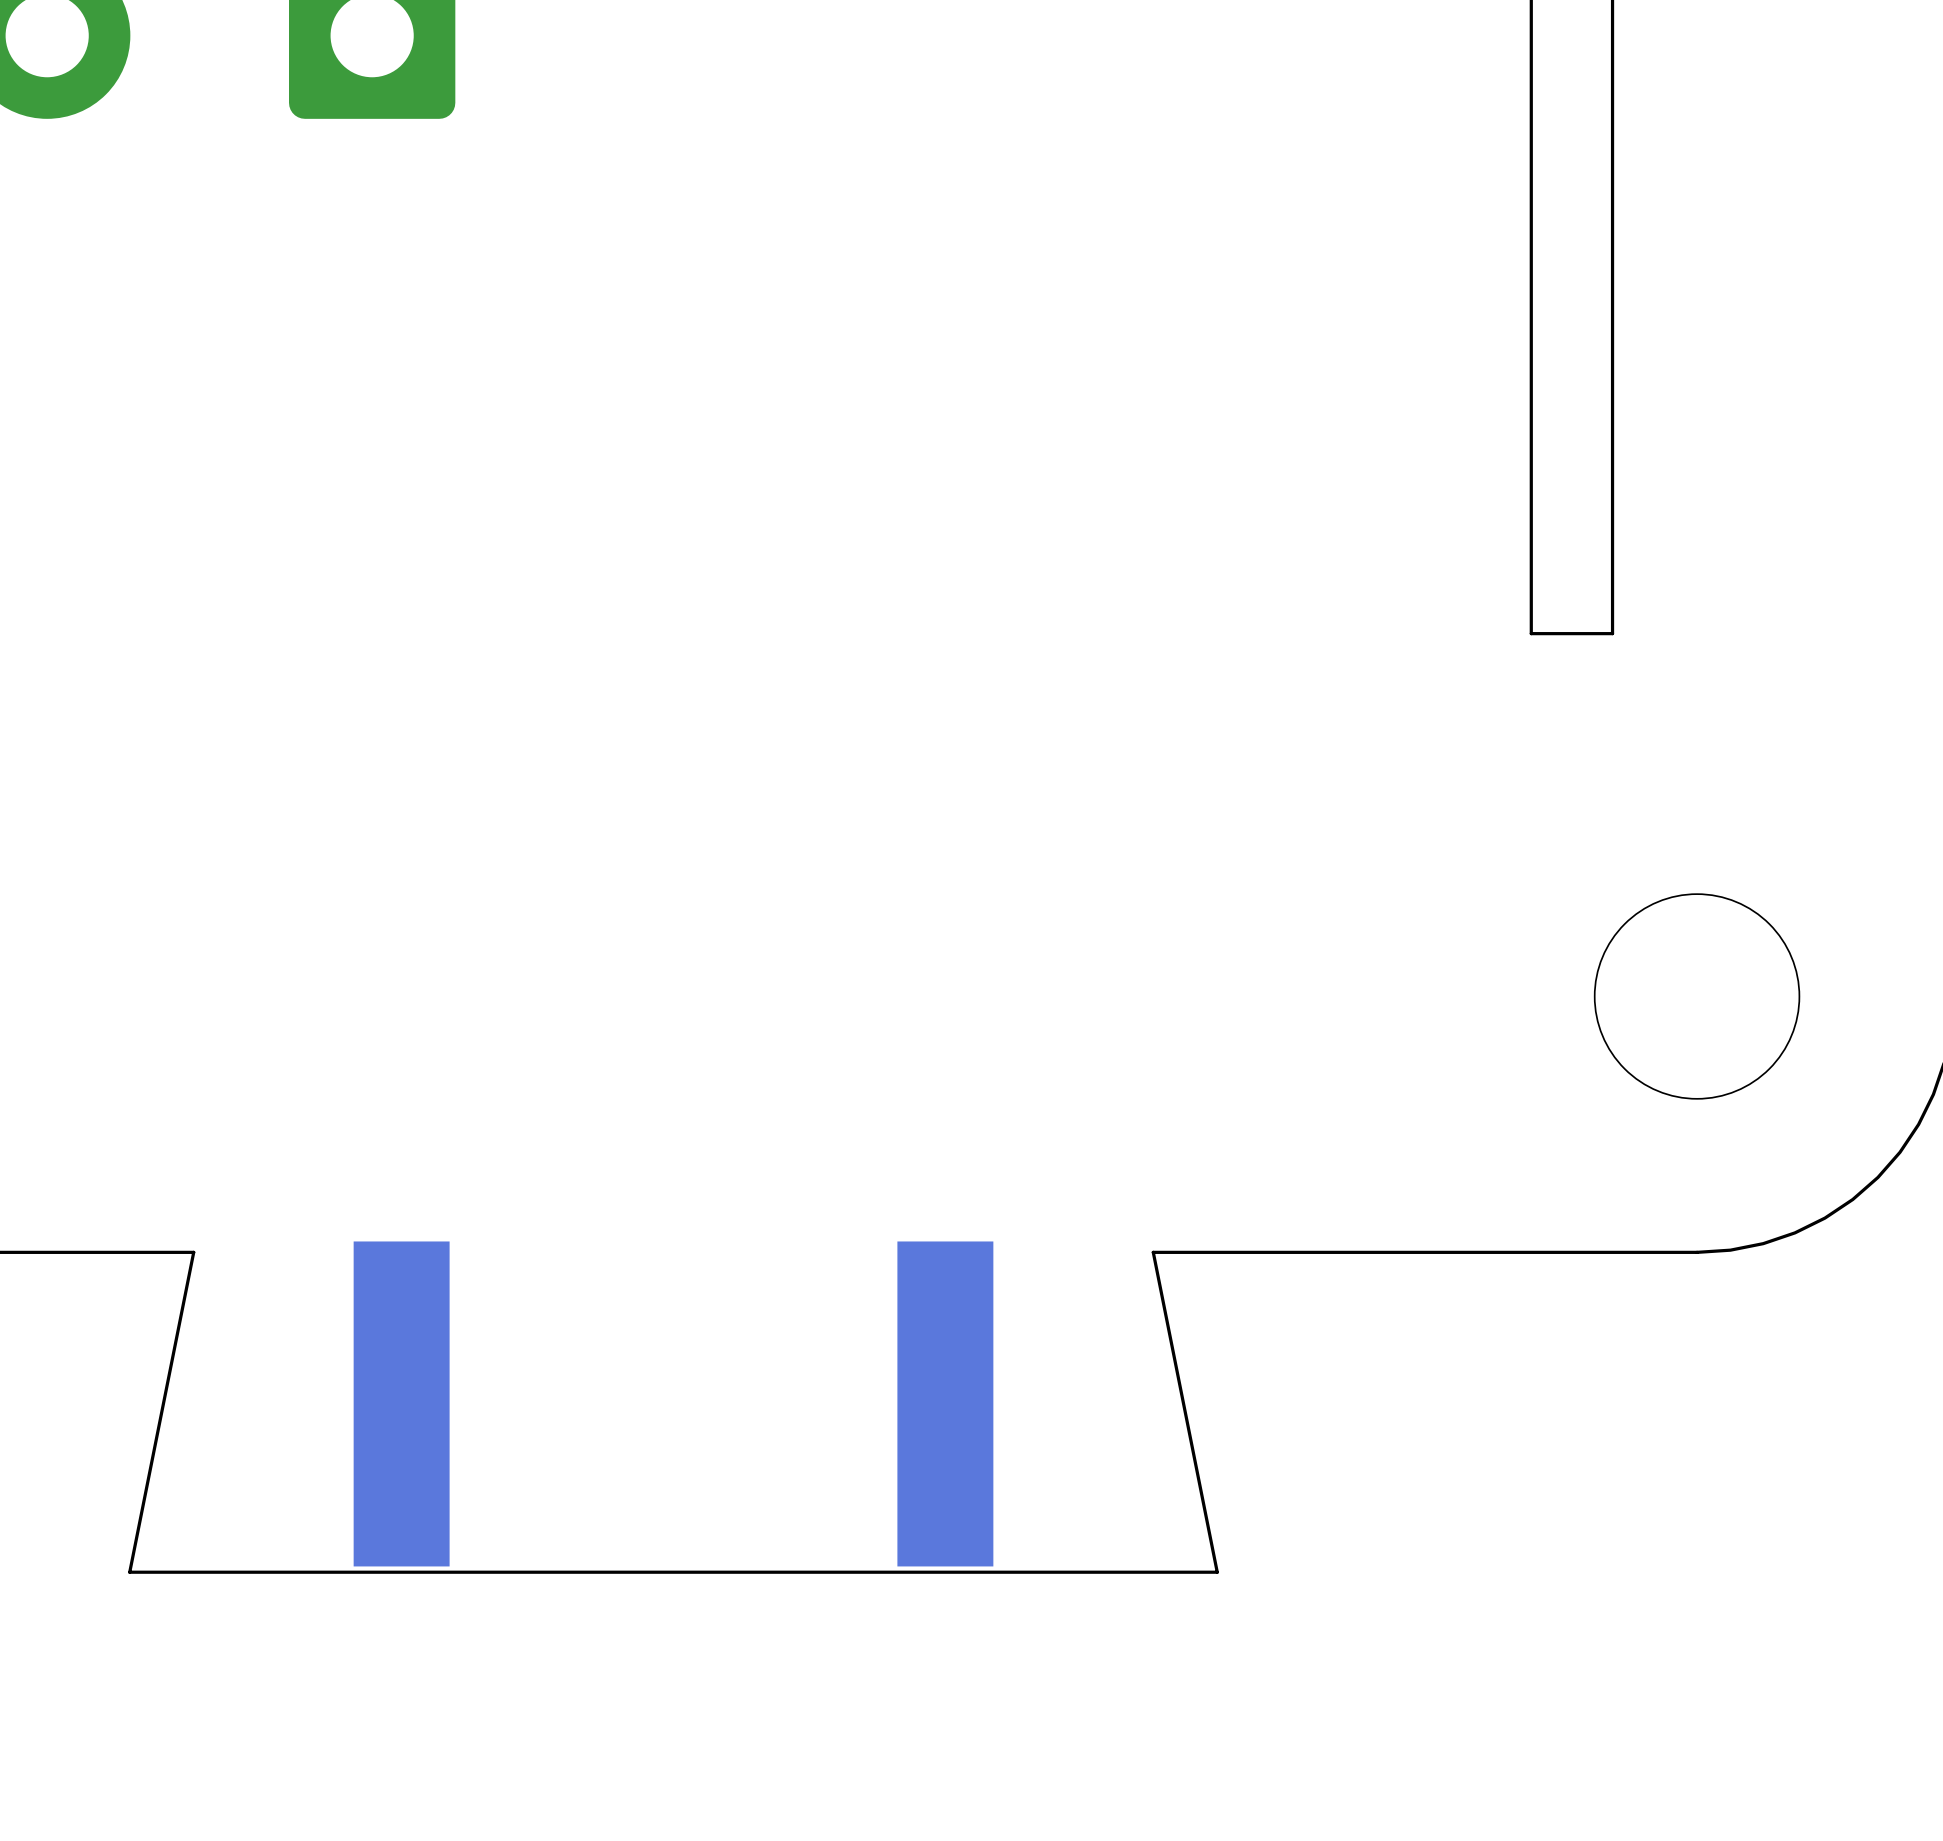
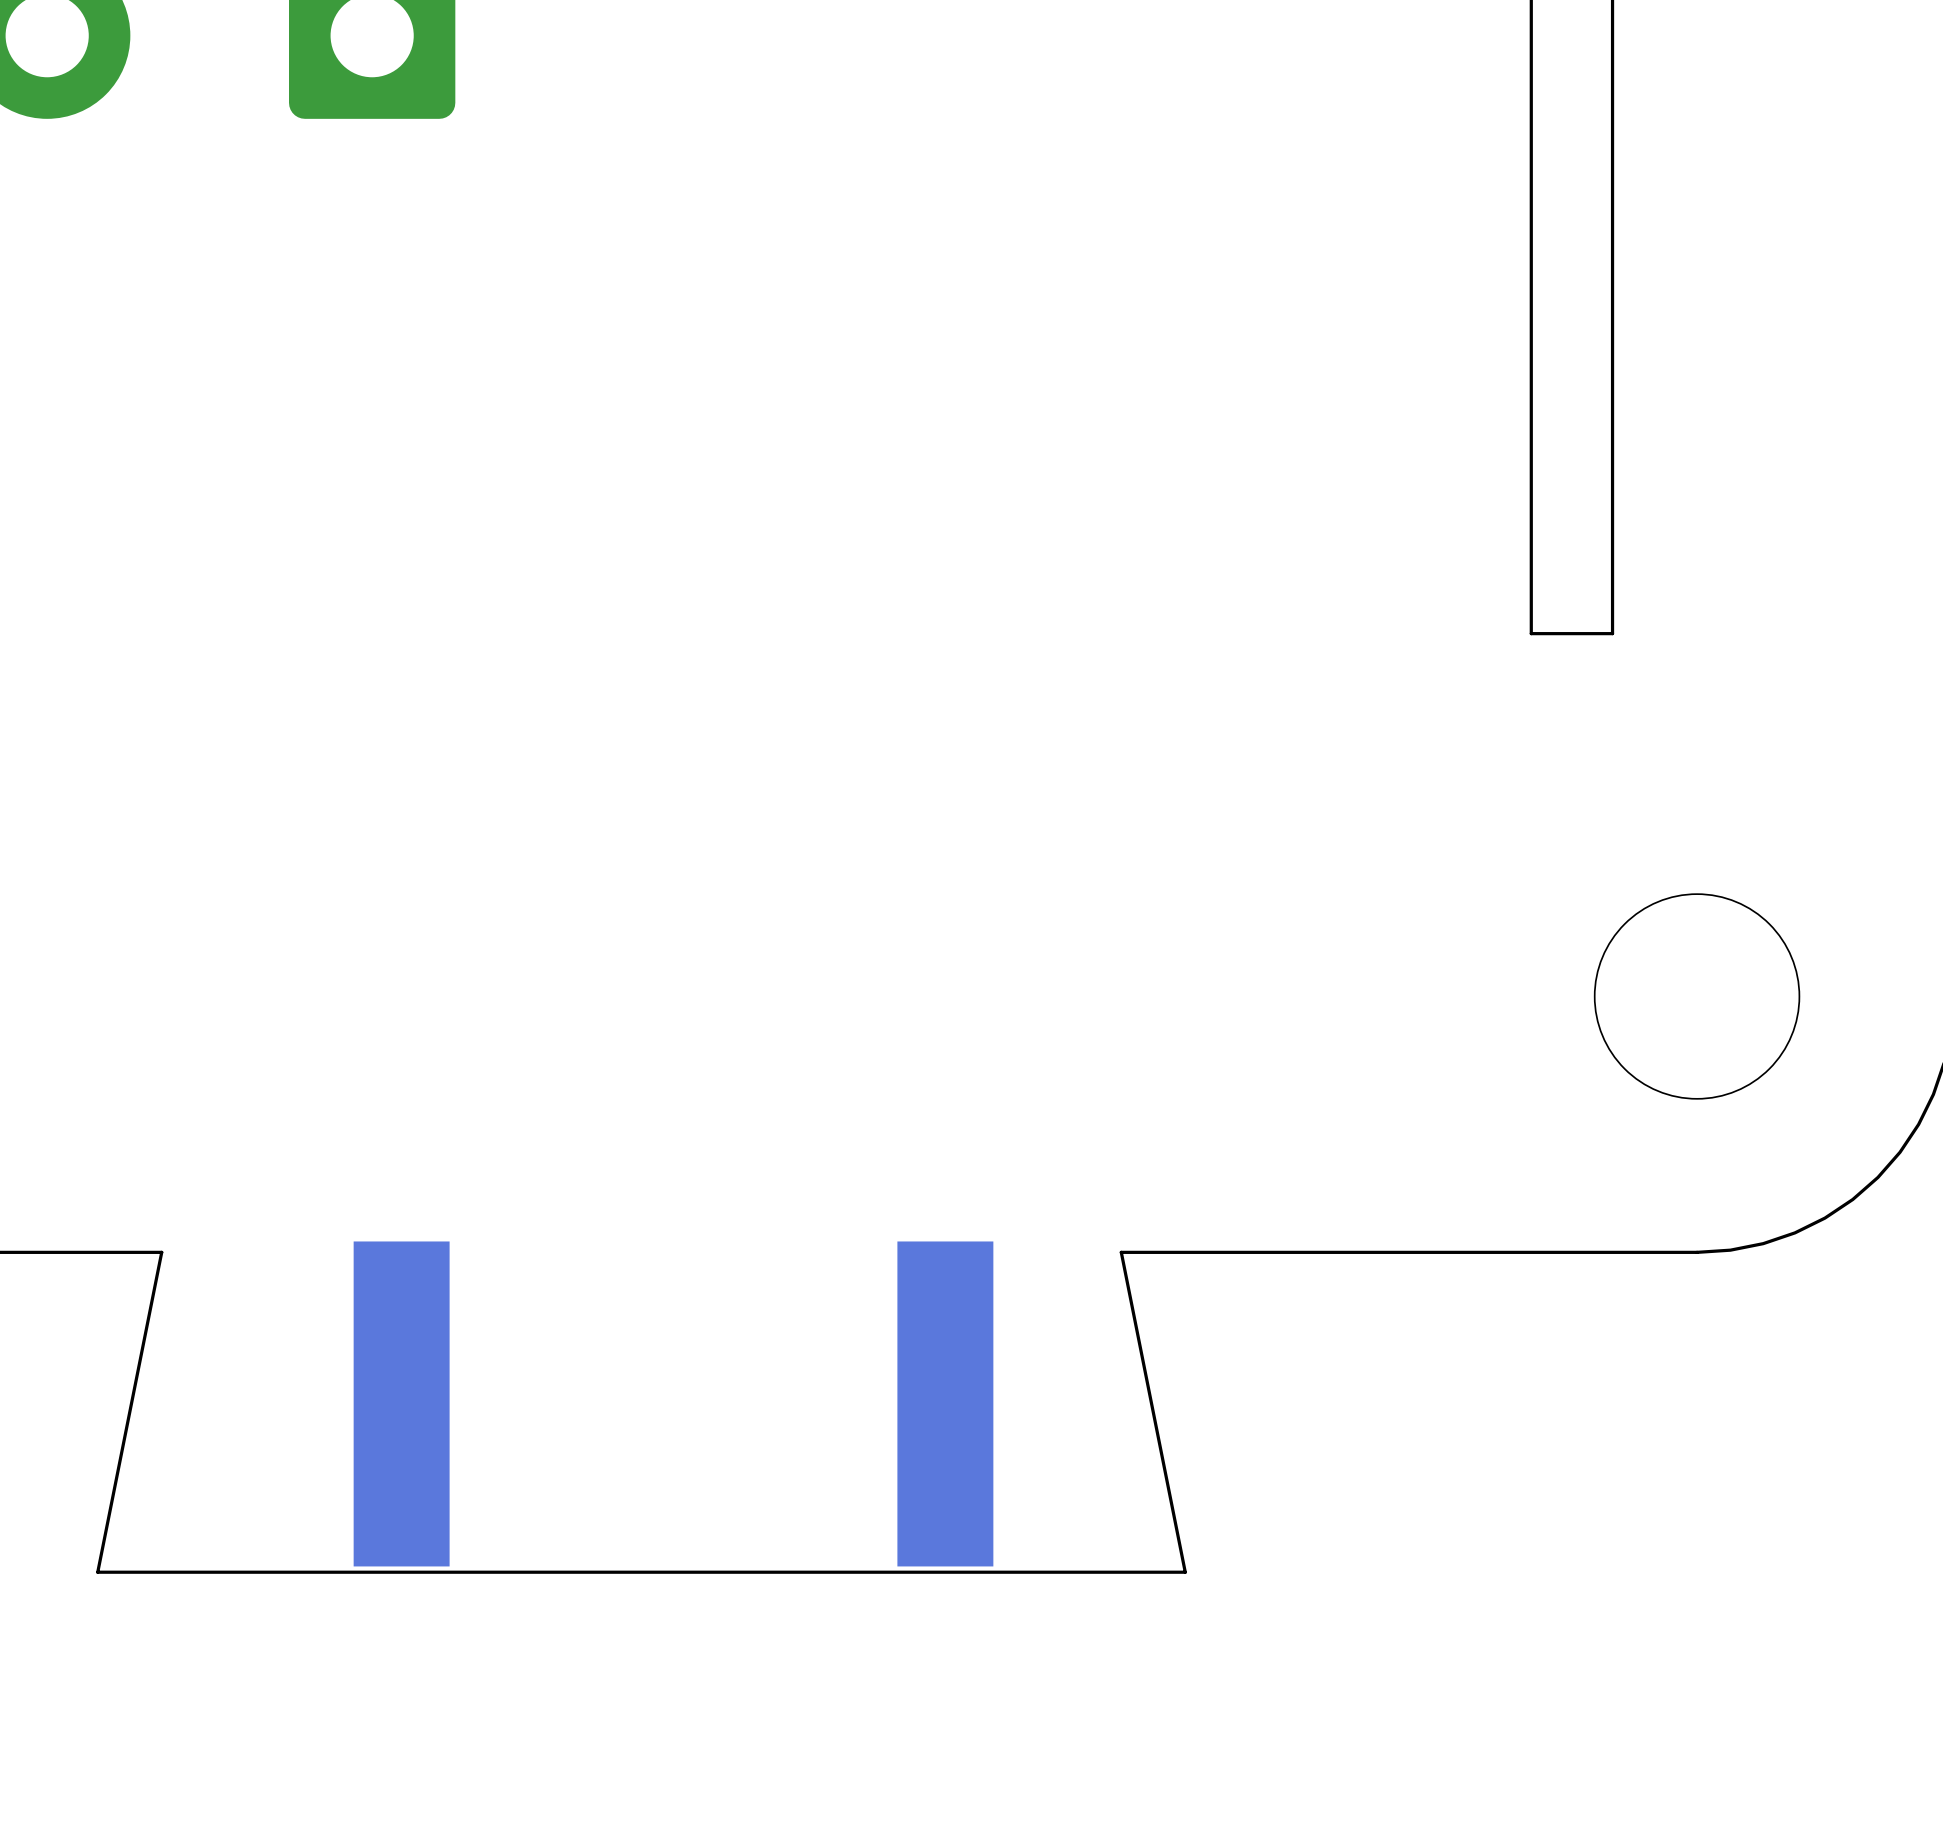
board edge: (161, 1252) (193, 1252) (129, 1572) -> (161, 1252) (97, 1572) (129, 1572)
board edge: (1153, 1252) (1217, 1572) (1185, 1572) -> (1153, 1252) (1121, 1252) (1185, 1572)

